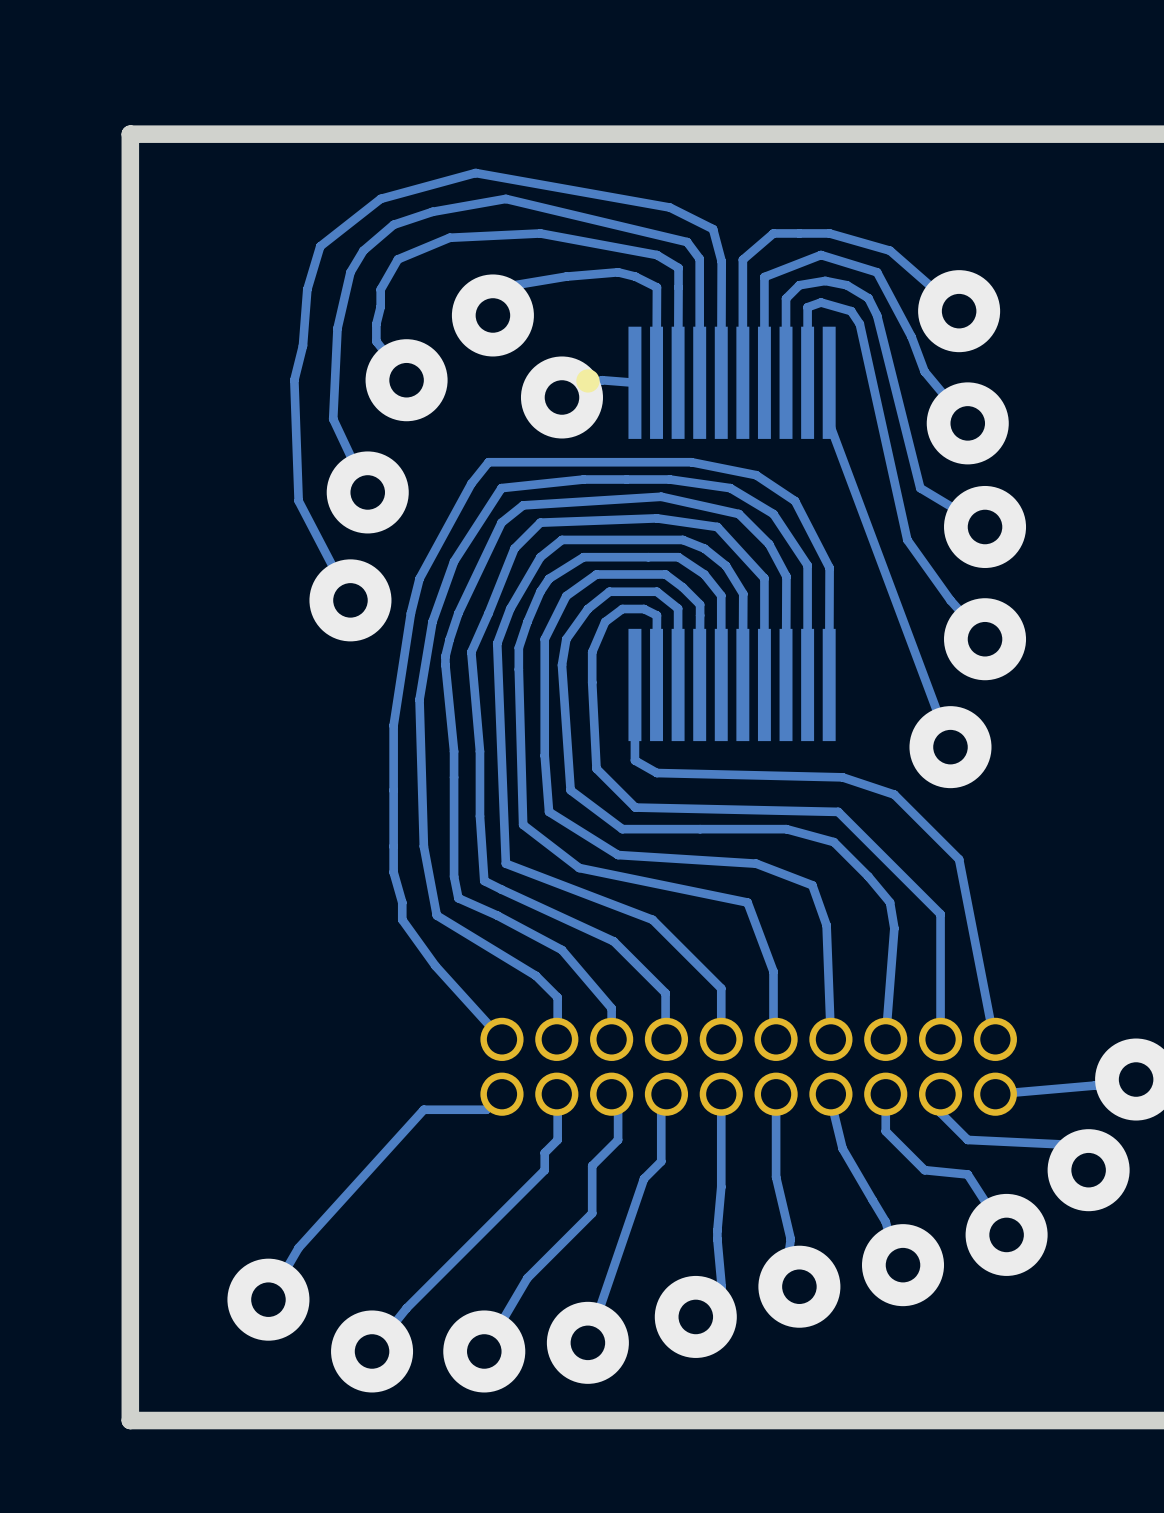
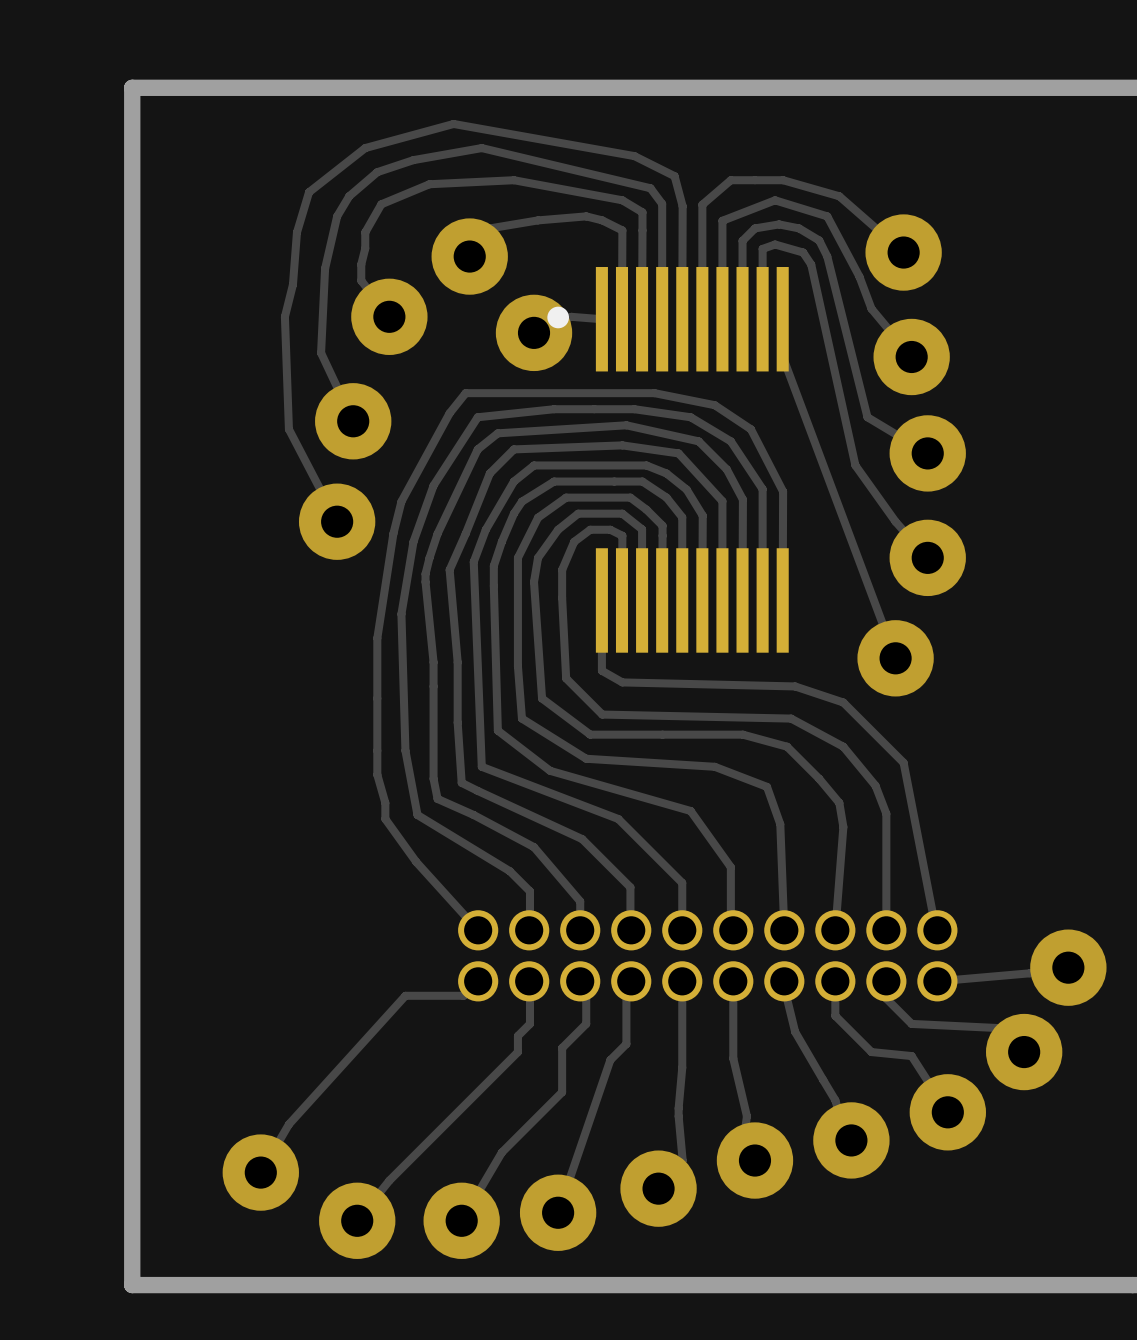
track: (838, 811) (940, 914) -> (791, 718) (843, 746) (875, 785) (886, 813)
track: (579, 868) (747, 902) (773, 971) -> (550, 770) (690, 810) (730, 867)

